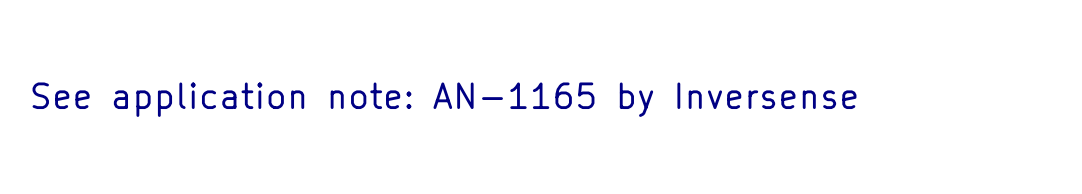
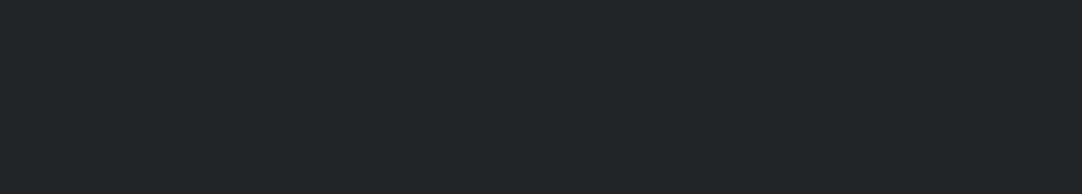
text: See application note: AN-1165 by Inversense (444, 99) -> none

